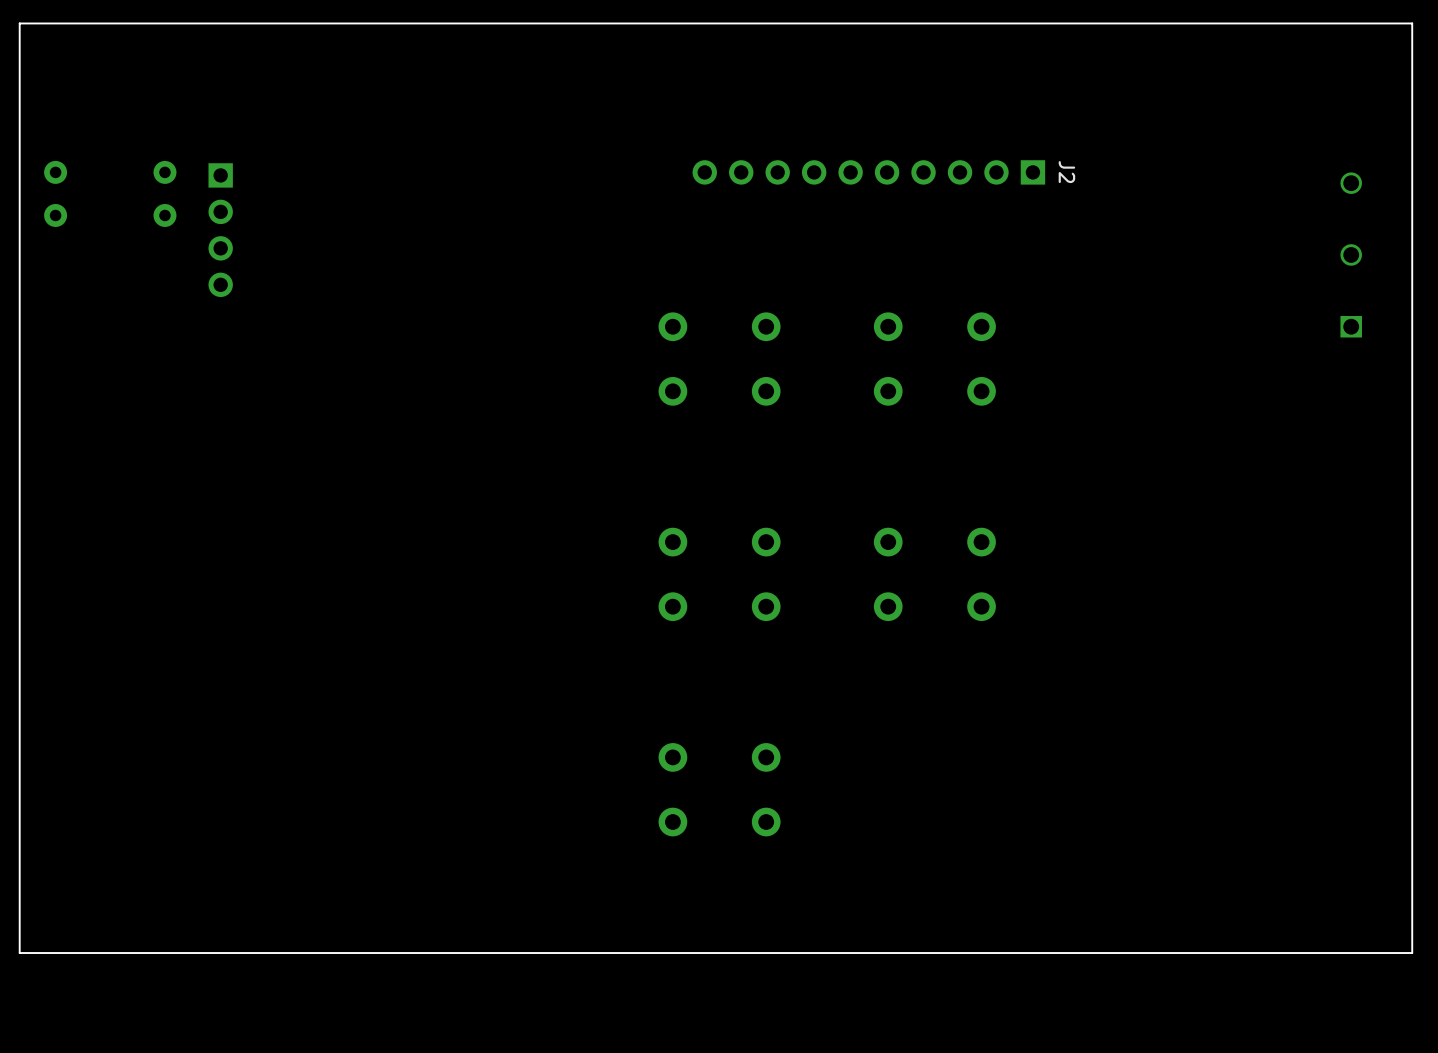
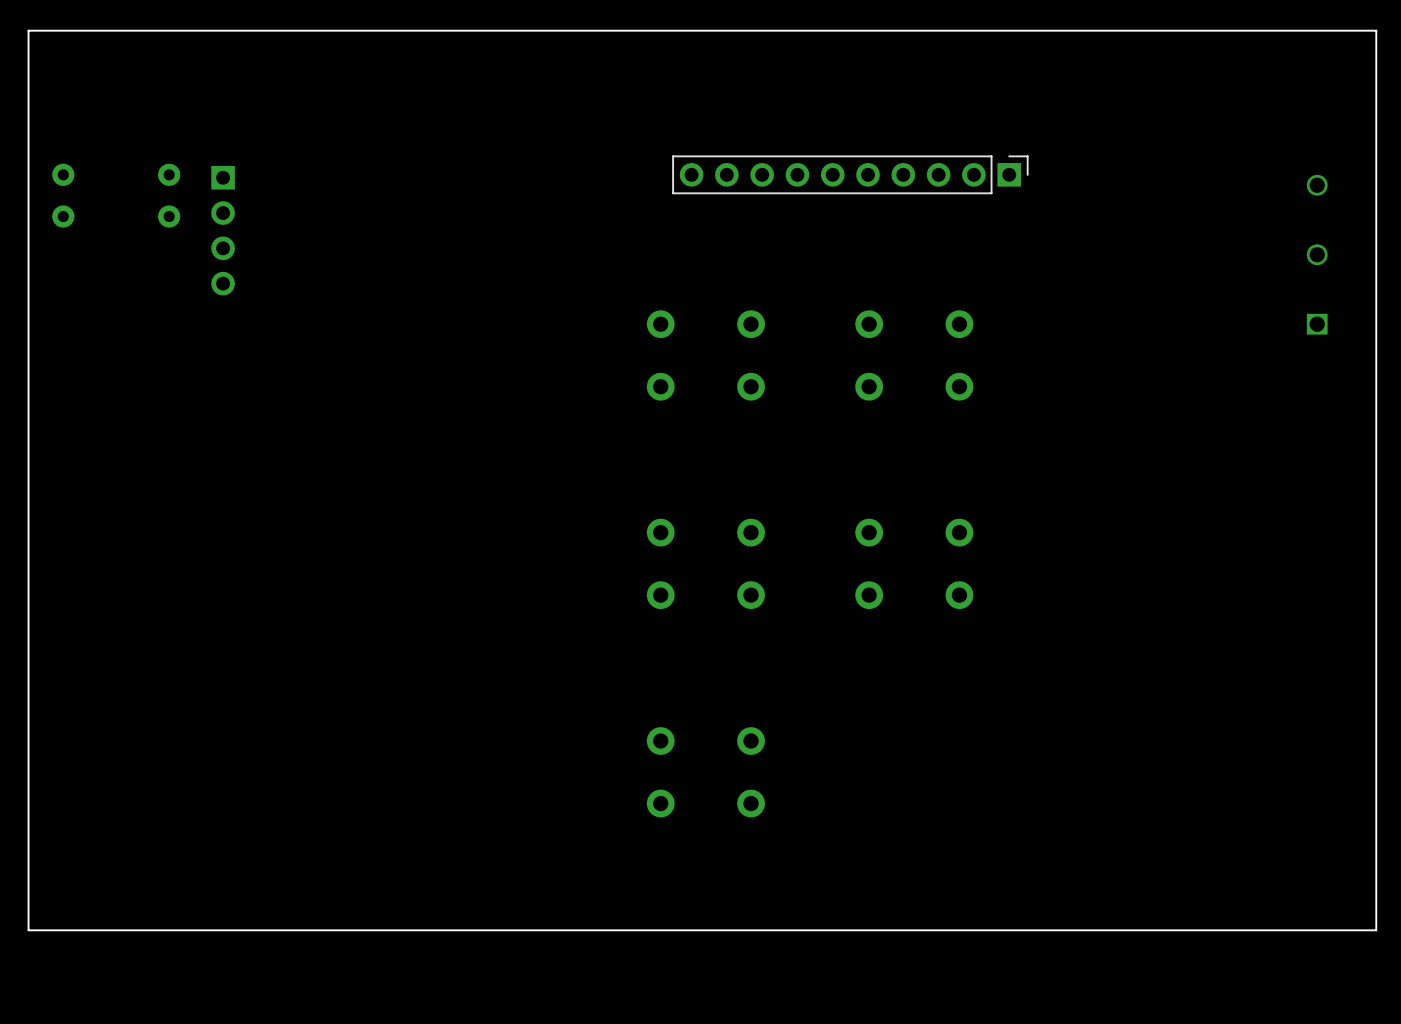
J2 side: top (868, 172) -> bottom (850, 174)

